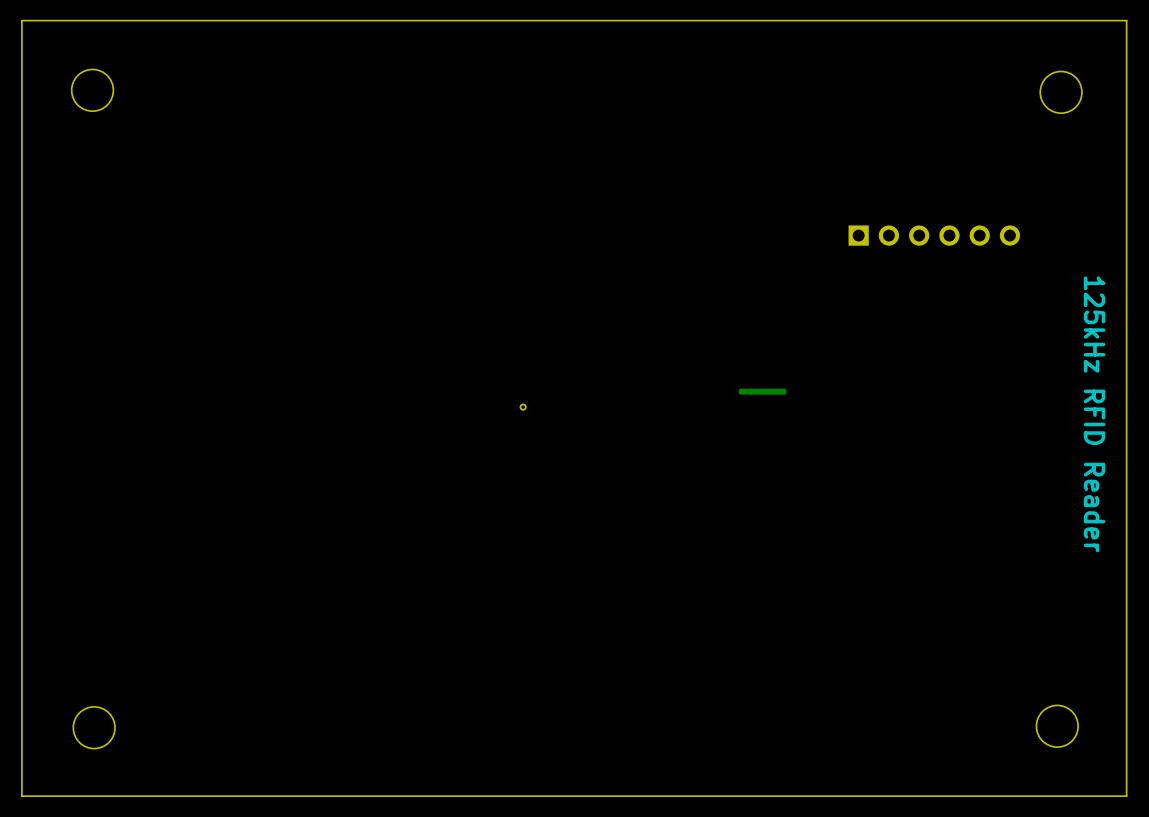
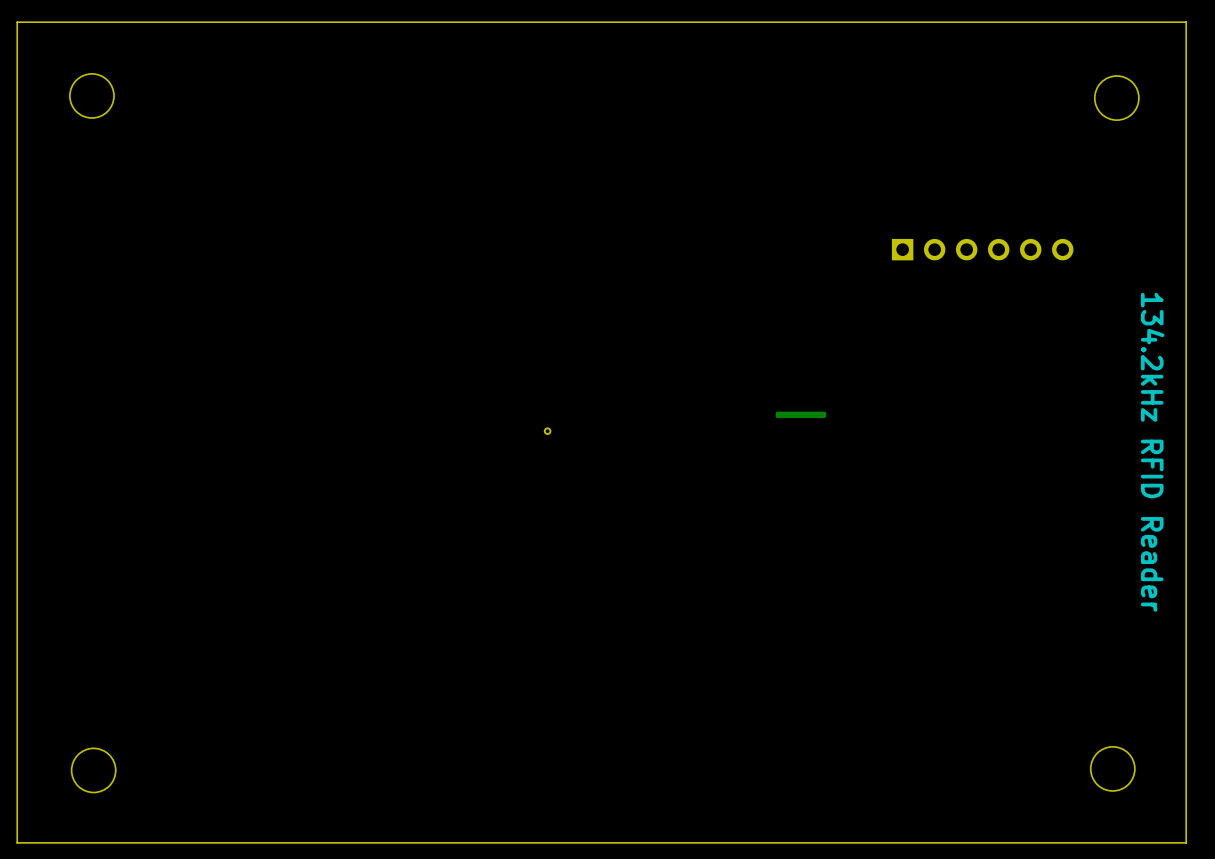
text: 125kHz RFID Reader (1094, 414) -> 134.2kHz RFID Reader (1152, 452)

